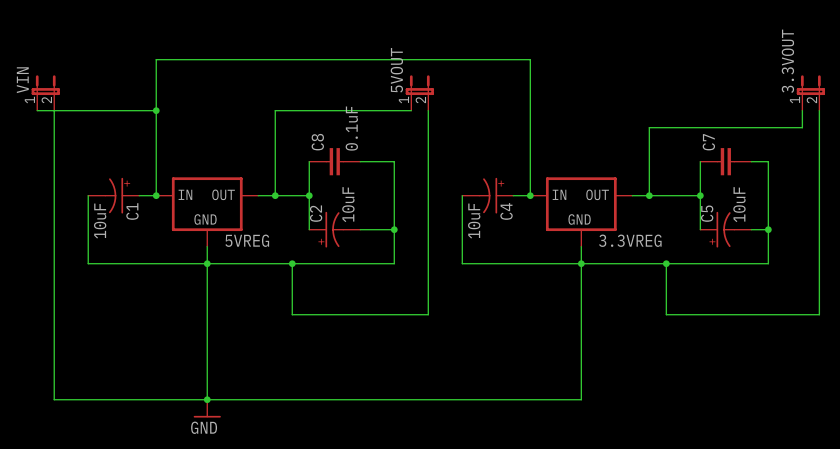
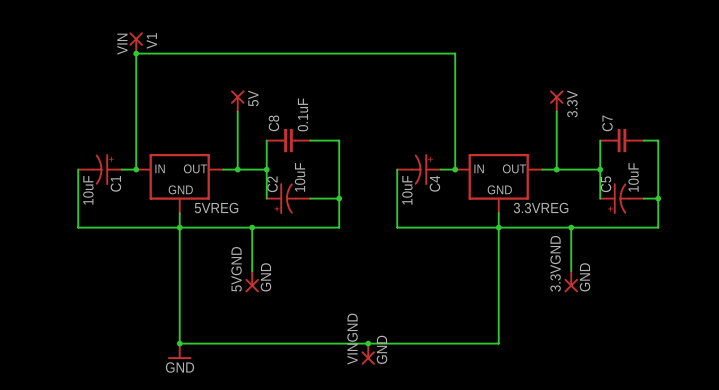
V1: none -> VIN (136, 43)
junction: none -> (136, 53)
VIN: (45, 92) -> none
5VOUT: (419, 92) -> none
3.3VOUT: (810, 92) -> none
wire: (37, 110) (156, 110) -> none
wire: (54, 110) (54, 399) (207, 399) -> none
junction: (156, 110) -> none
wire: (411, 110) (275, 110) (275, 127) -> none
wire: (428, 110) (428, 314) (292, 314) -> none
wire: (802, 110) (802, 127) (649, 127) -> none
wire: (819, 110) (819, 314) (666, 314) -> none
5V: none -> (237, 101)
3.3V: none -> (556, 101)
5VGND: none -> GND (252, 281)
3.3VGND: none -> GND (571, 281)
junction: none -> (368, 343)
VINGND: none -> GND (368, 354)

